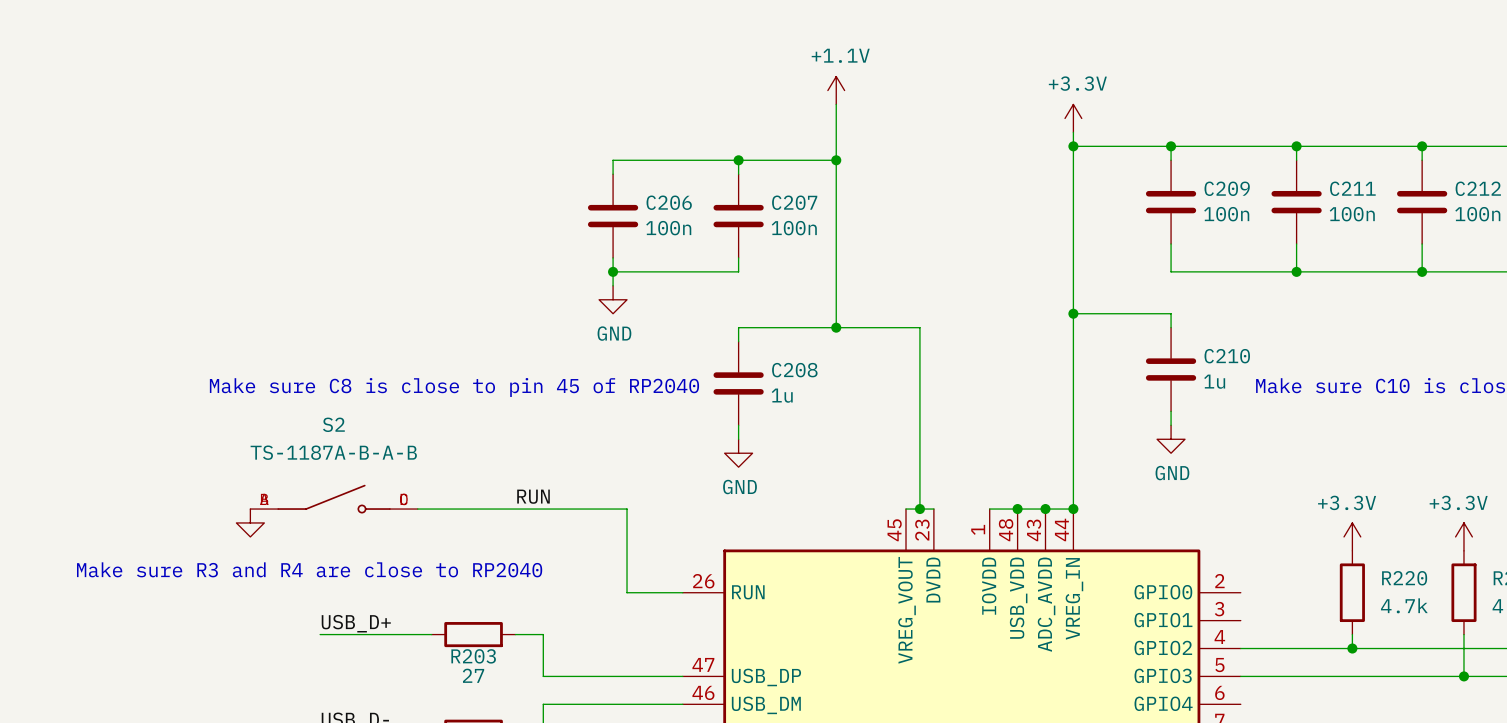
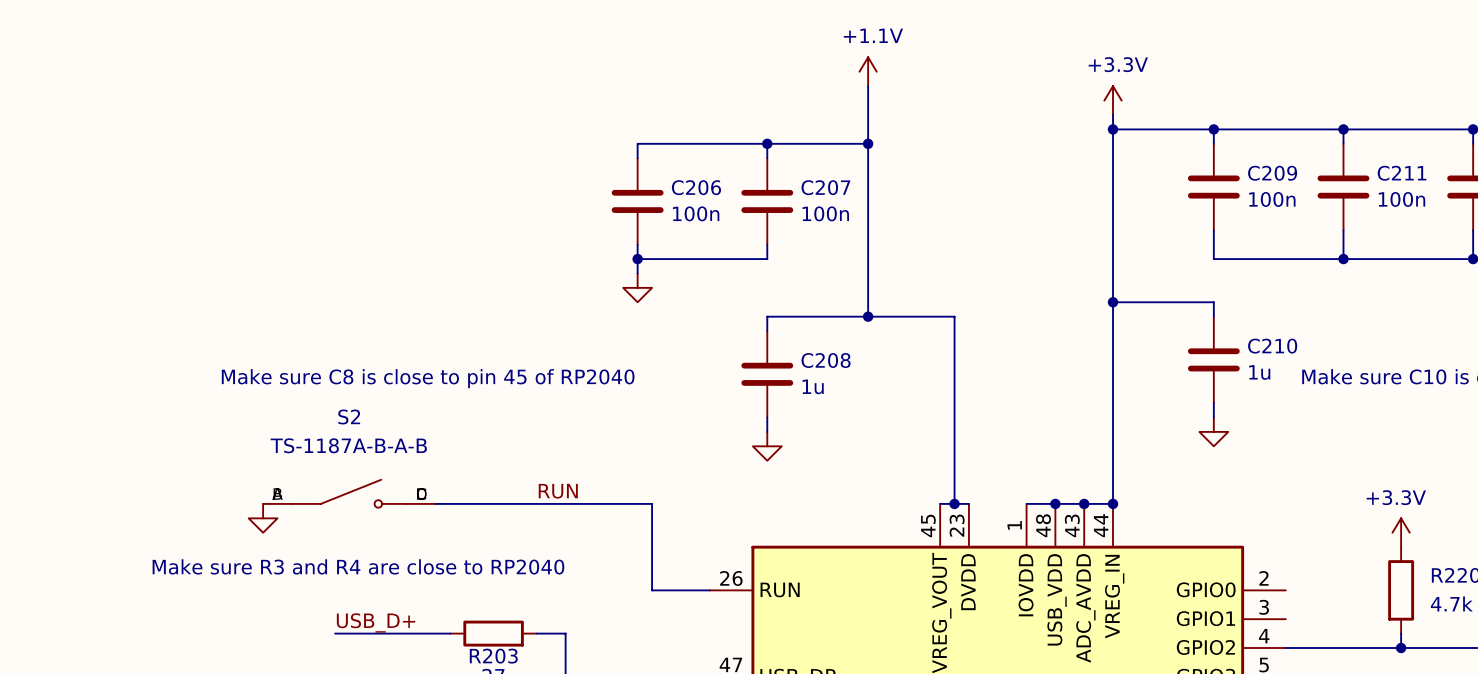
power symbol text: GND (614, 333) -> none
power symbol text: GND (1172, 473) -> none
power symbol text: GND (740, 487) -> none

